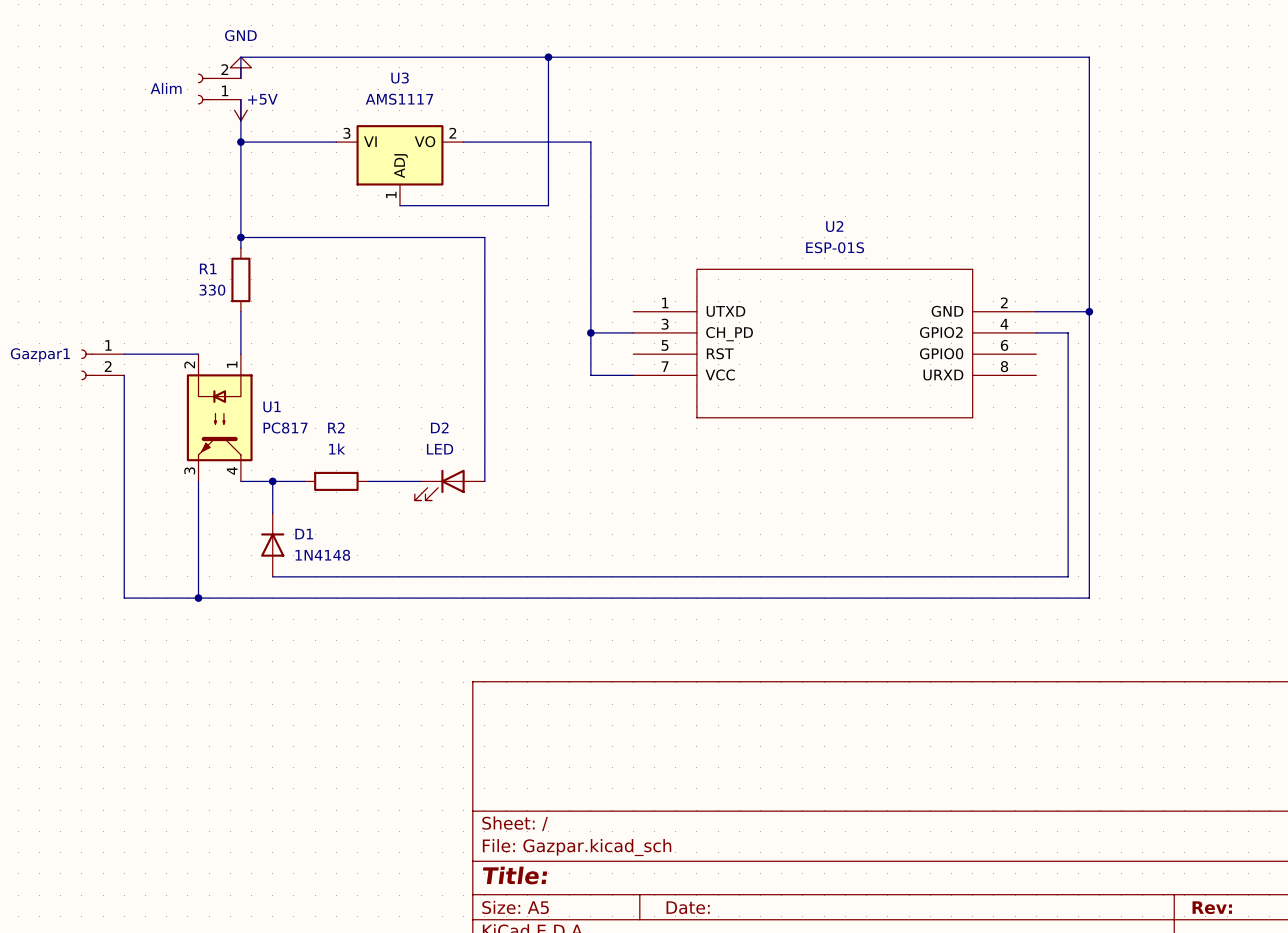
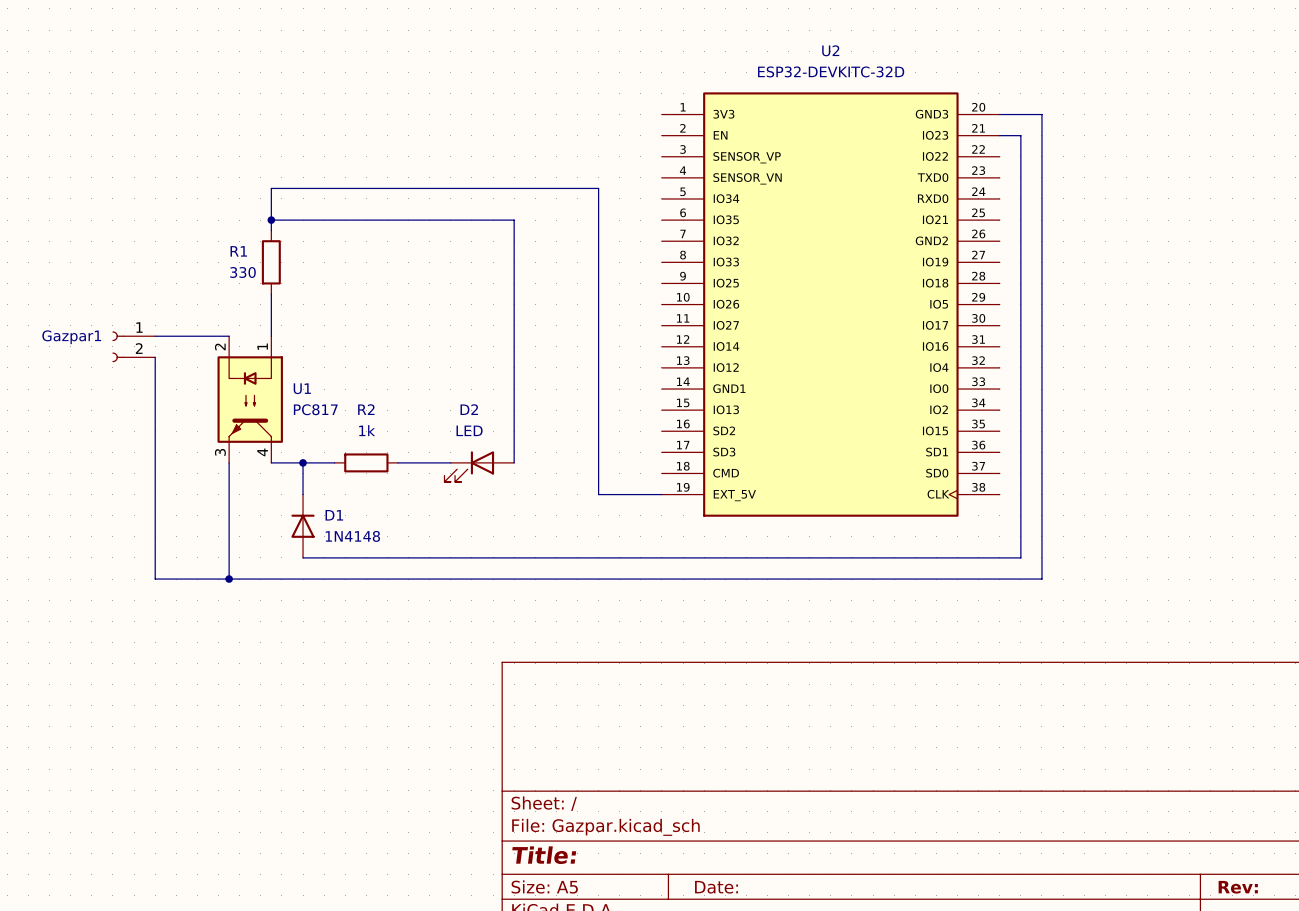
bus: (548, 57) (548, 205) -> (661, 494) (598, 494) (598, 188) (577, 188)
junction: (548, 57) -> none
power symbol: GND (240, 67) -> none
bus: (240, 78) (240, 57) (1089, 57) (1089, 598) (1015, 598) -> (999, 114) (1041, 114) (1041, 579)
part: Alim (219, 89) -> none
bus: (240, 99) (240, 205) -> (429, 188) (271, 188)
power symbol: +5V (240, 110) -> none
bus: (240, 142) (336, 142) -> none
junction: (240, 142) -> none
bus: (463, 142) (590, 142) (590, 375) (633, 375) -> none
U3: AMS1117 (399, 165) -> none
U2 name position: U2 (834, 226) -> U2 (830, 50)
U2 value: ESP-01S (835, 247) -> ESP32-DEVKITC-32D (831, 71)
U2 symbol: [633, 269, 1037, 418] -> [661, 92, 1000, 517]
bus: (1036, 311) (1089, 311) -> none
junction: (1089, 311) -> none
bus: (590, 332) (633, 332) -> none
junction: (590, 332) -> none
bus: (1036, 332) (1068, 332) (1068, 576) (993, 576) -> (999, 135) (1020, 135) (1020, 557)

